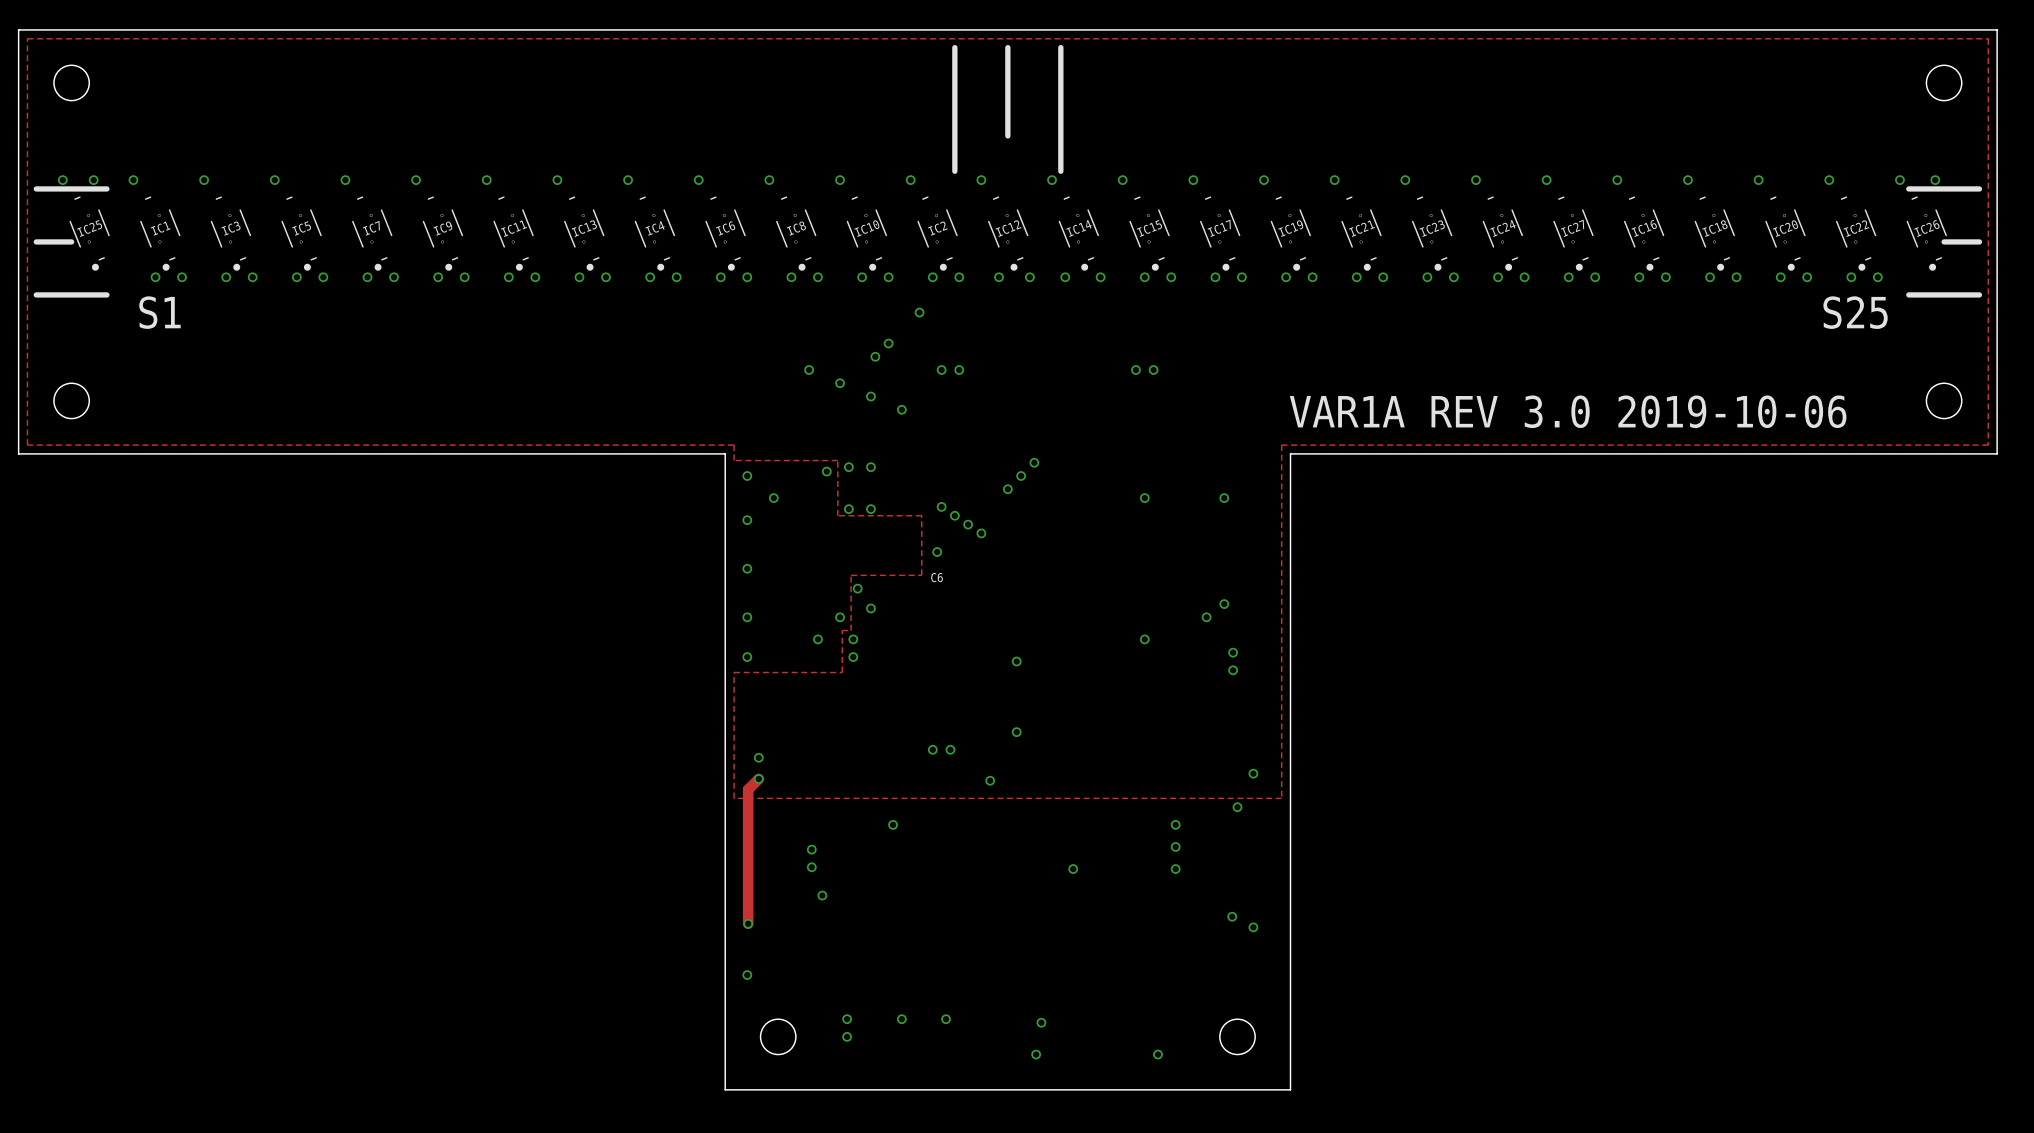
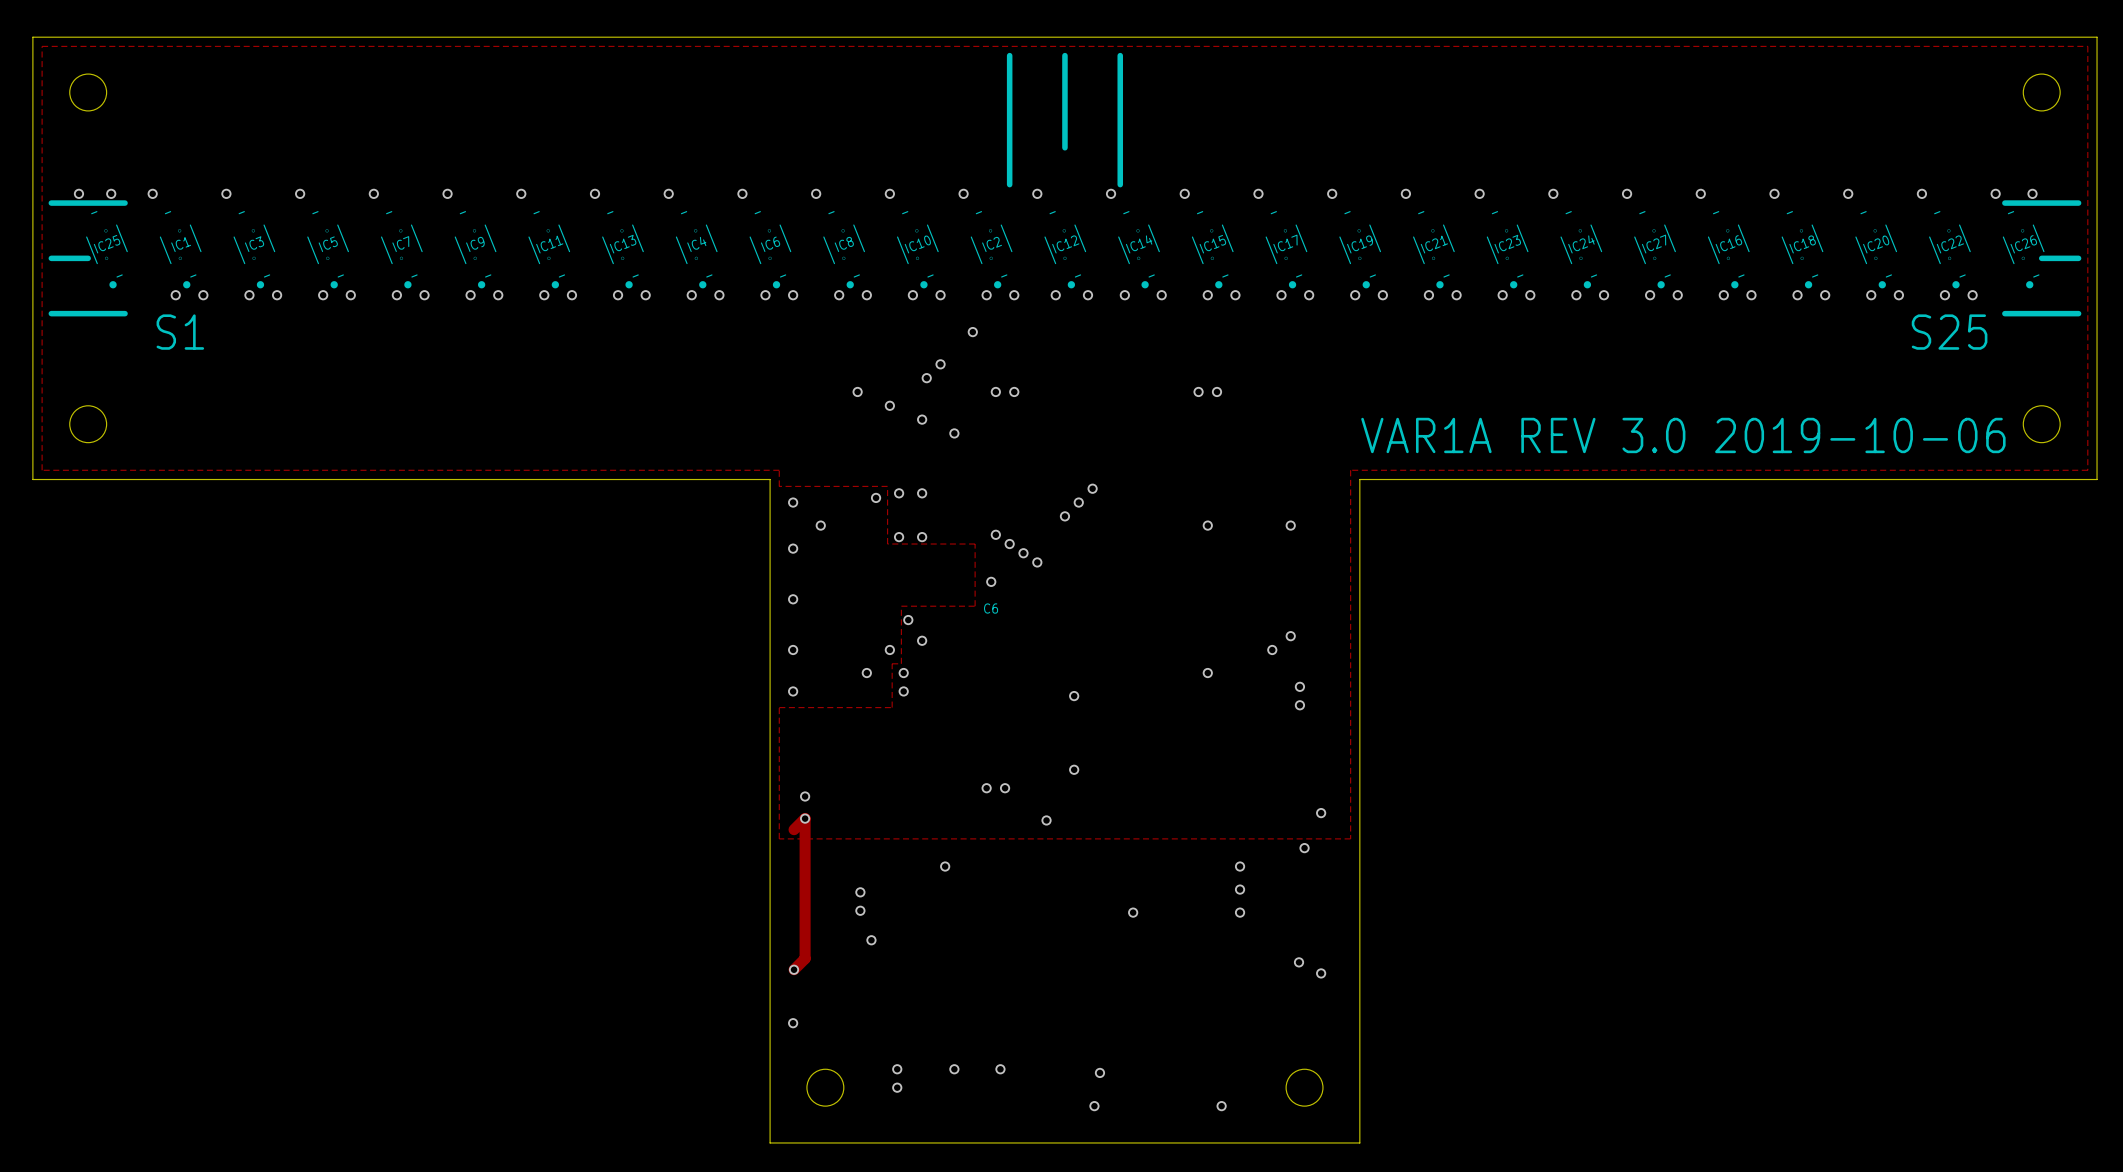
track: (748, 789) (748, 923) -> (805, 818) (805, 958) (794, 969)

